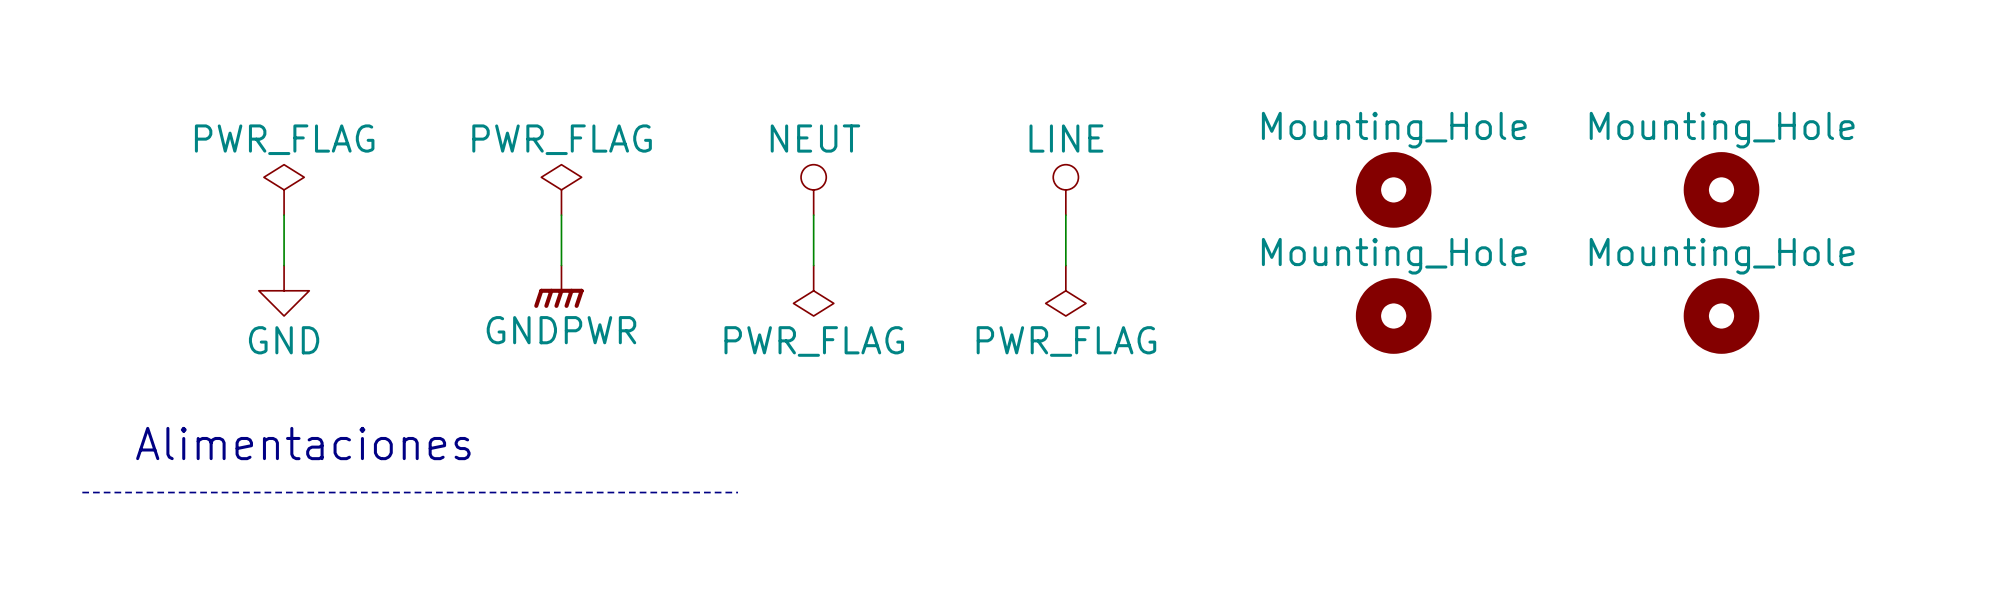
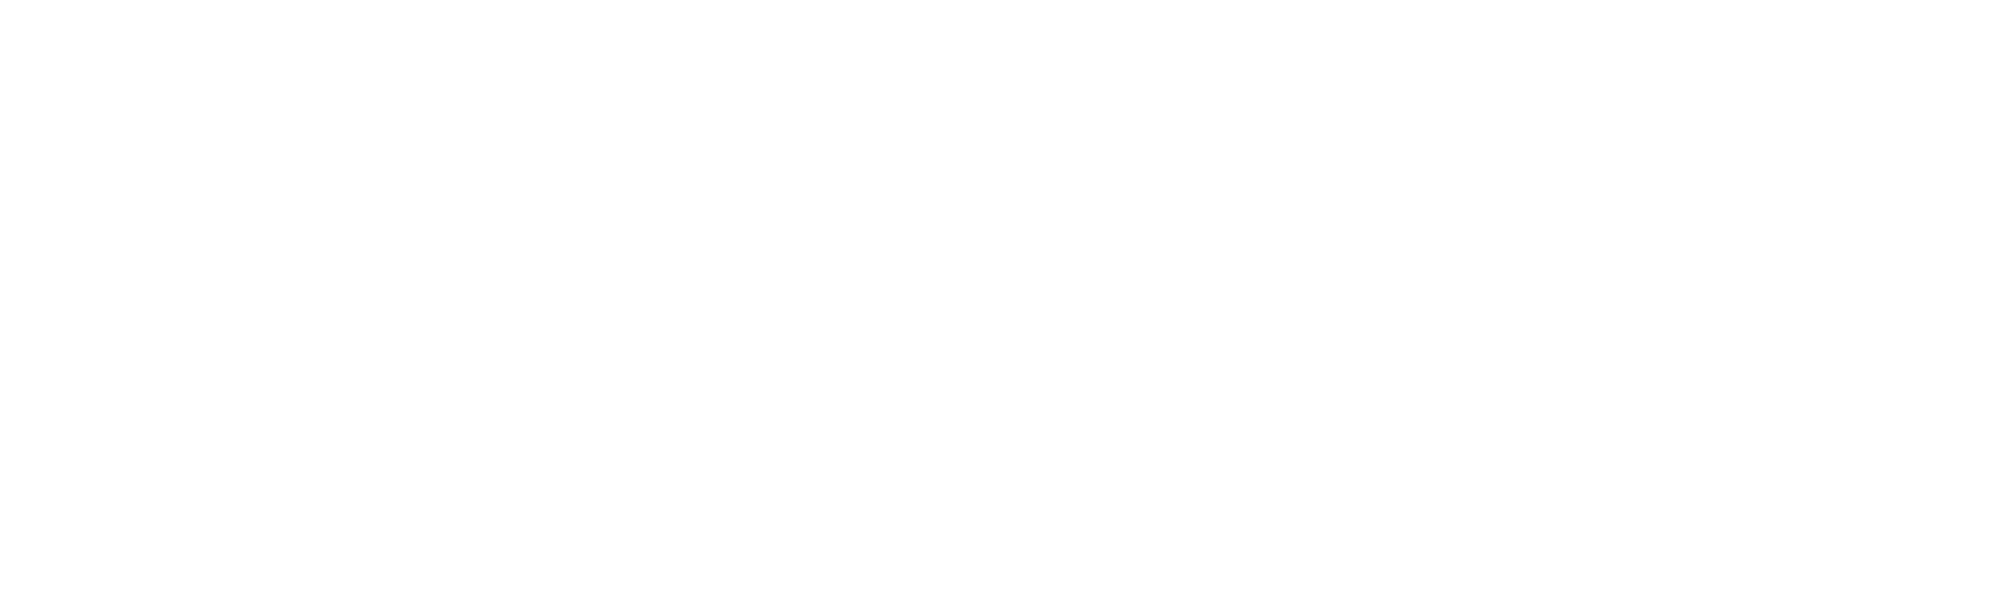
power symbol: PWR_FLAG (284, 189) -> none
power symbol: PWR_FLAG (561, 189) -> none
power symbol: NEUT (813, 189) -> none
power symbol: LINE (1065, 189) -> none
part: Mounting_Hole (1393, 189) -> none
part: Mounting_Hole (1721, 189) -> none
wire: (284, 215) (284, 265) -> none
wire: (561, 215) (561, 265) -> none
wire: (813, 215) (813, 265) -> none
wire: (1065, 215) (1065, 265) -> none
power symbol: GNDPWR (558, 286) -> none
power symbol: GND (284, 290) -> none
power symbol: PWR_FLAG (813, 290) -> none
power symbol: PWR_FLAG (1065, 290) -> none
part: Mounting_Hole (1393, 316) -> none
part: Mounting_Hole (1721, 316) -> none
text: Alimentaciones (303, 443) -> none
line: (82, 492) (738, 492) -> none

